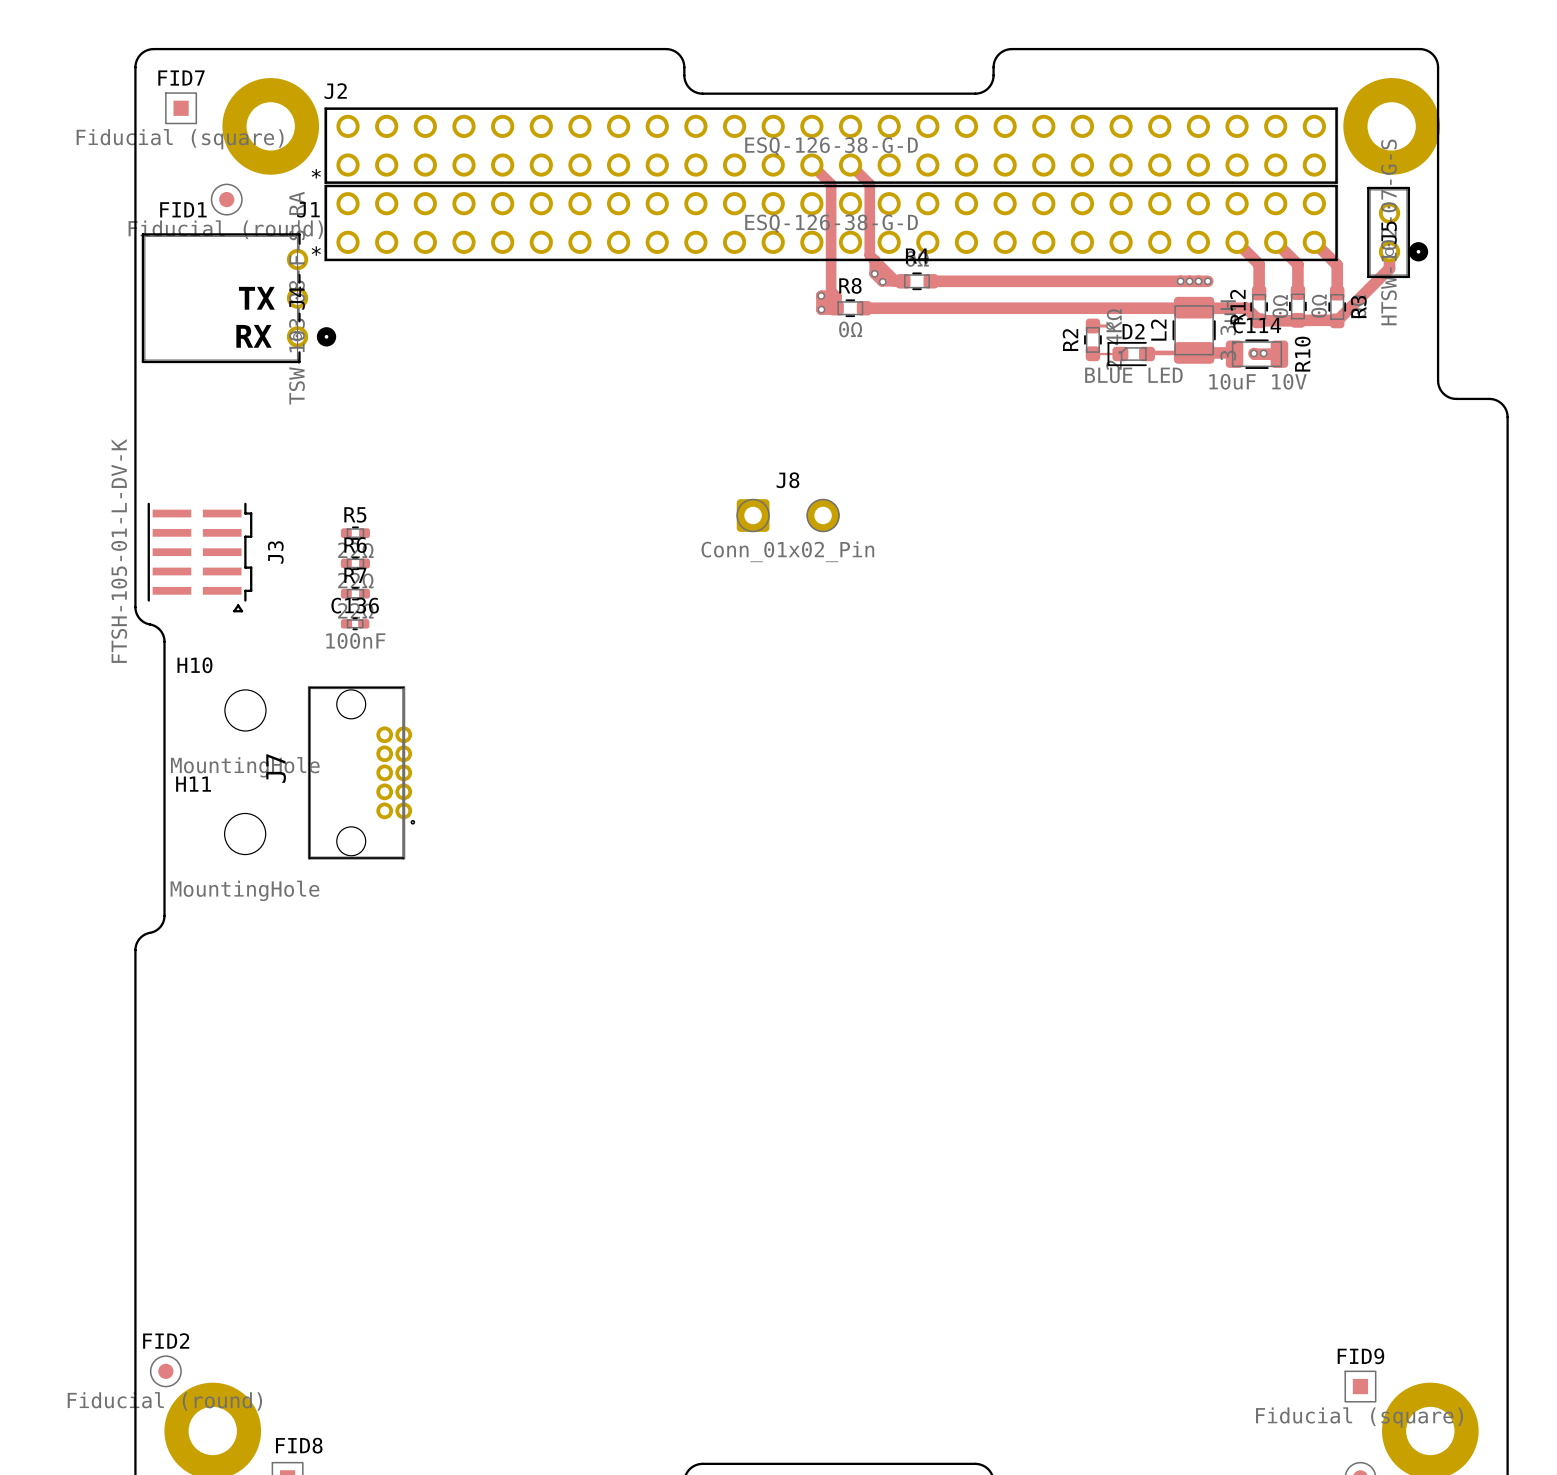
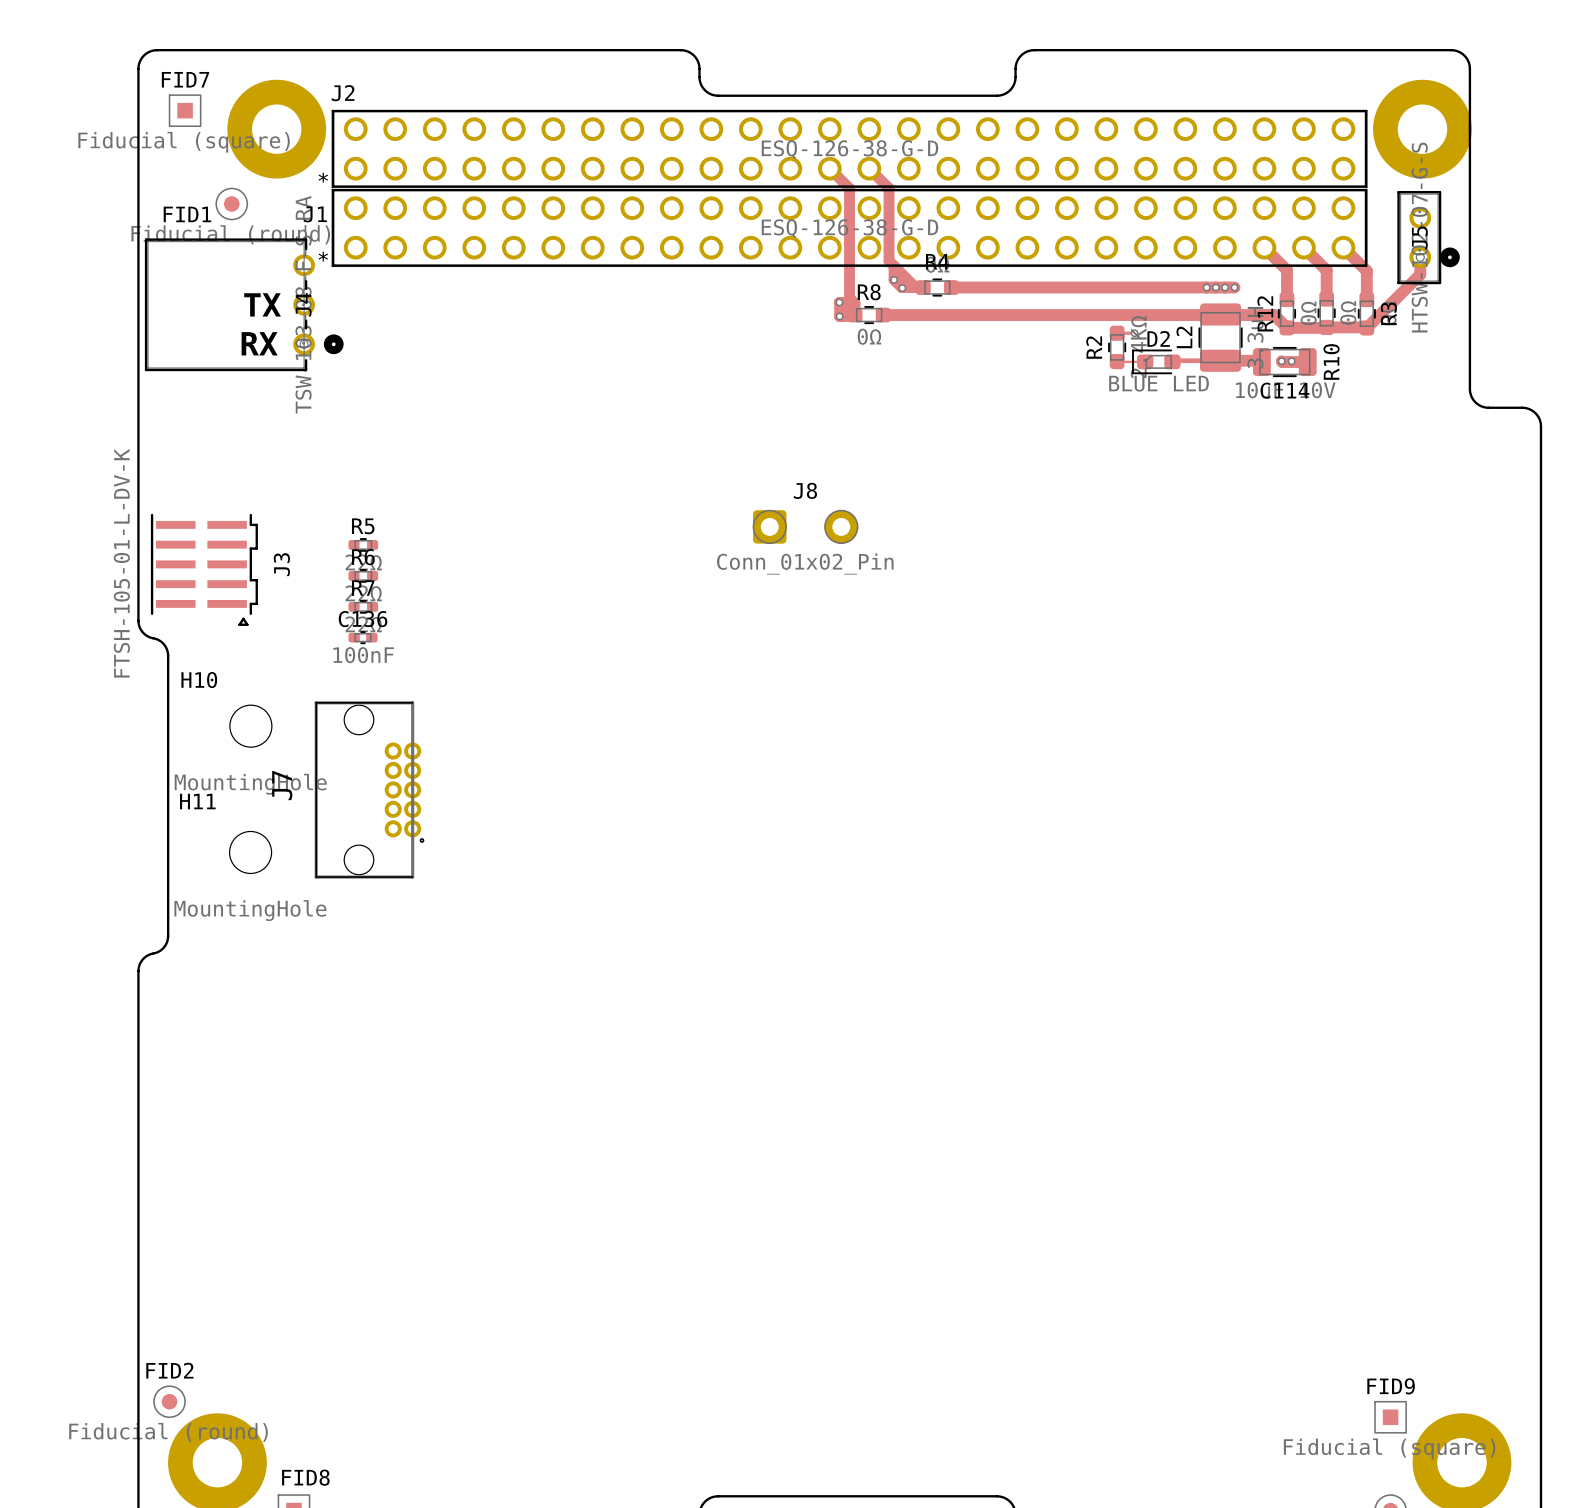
C114 name position: C114 (1257, 325) -> C114 (1285, 390)

